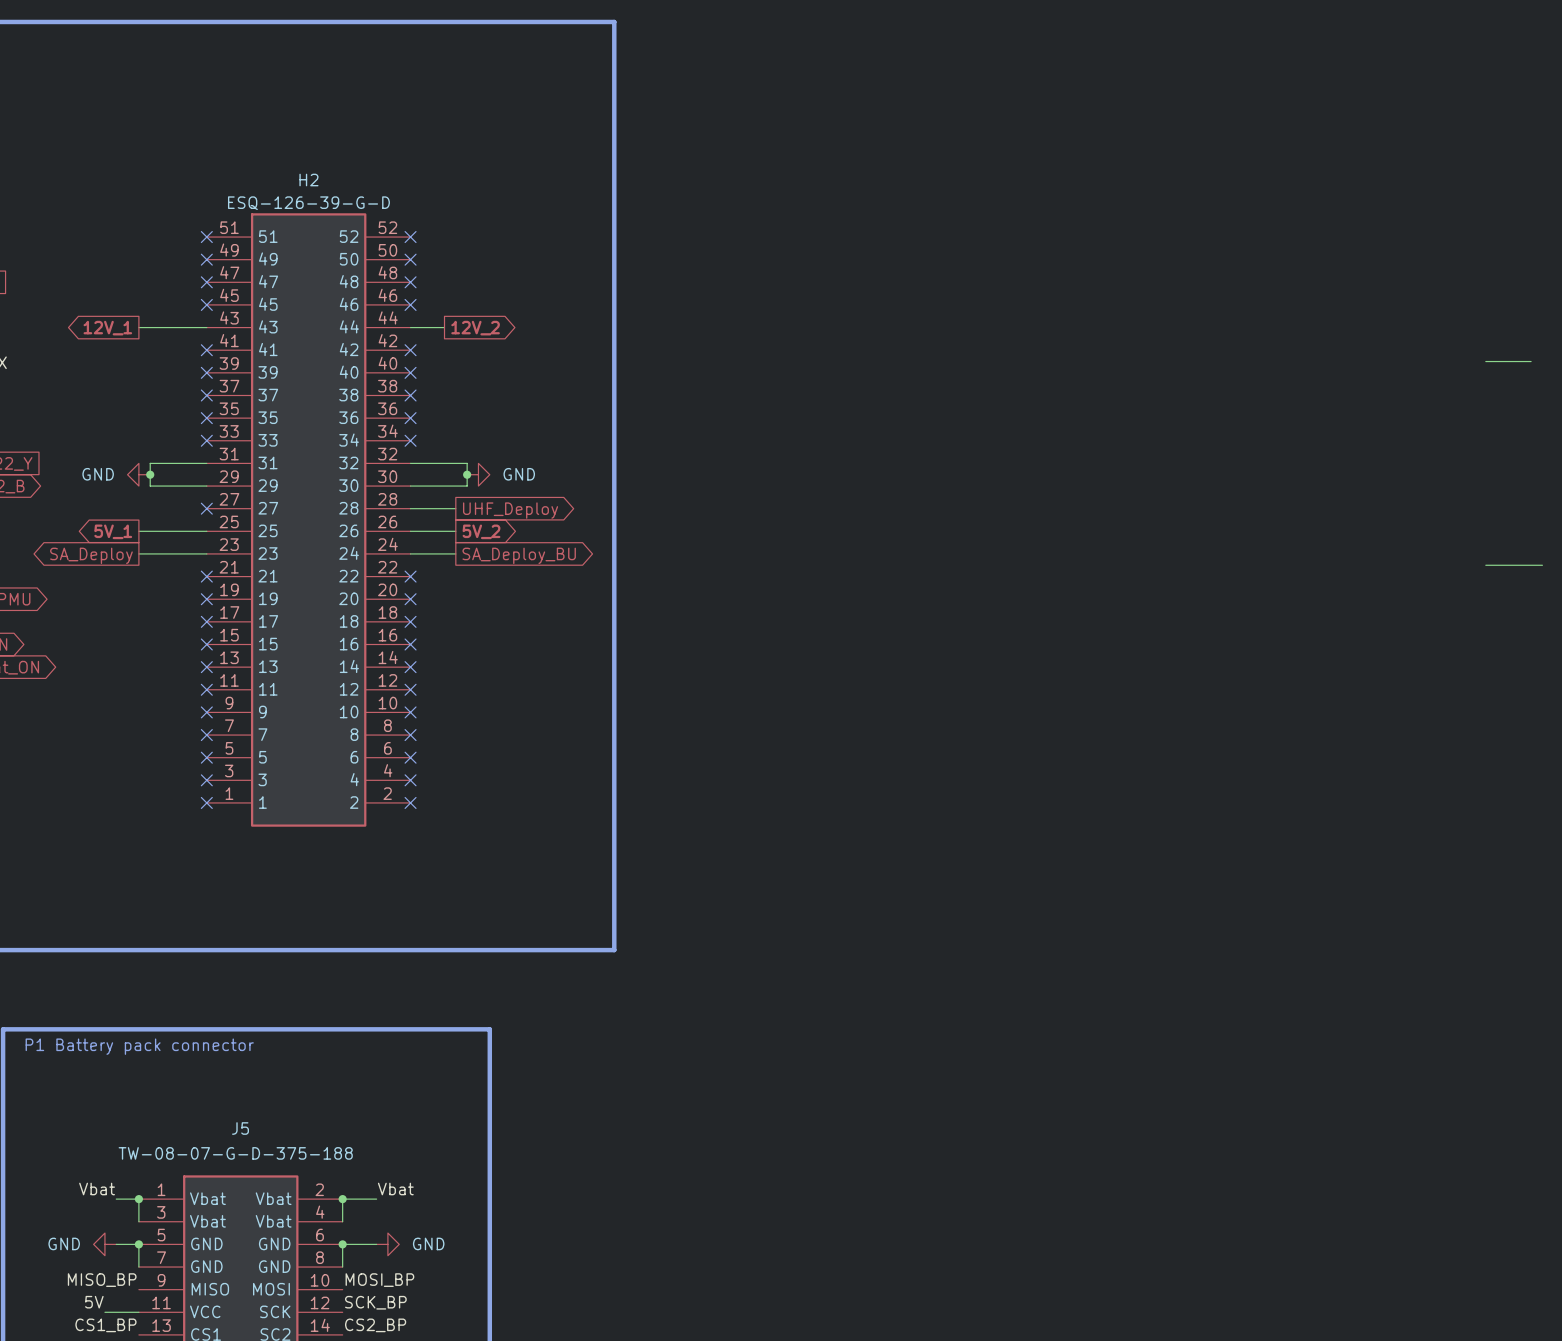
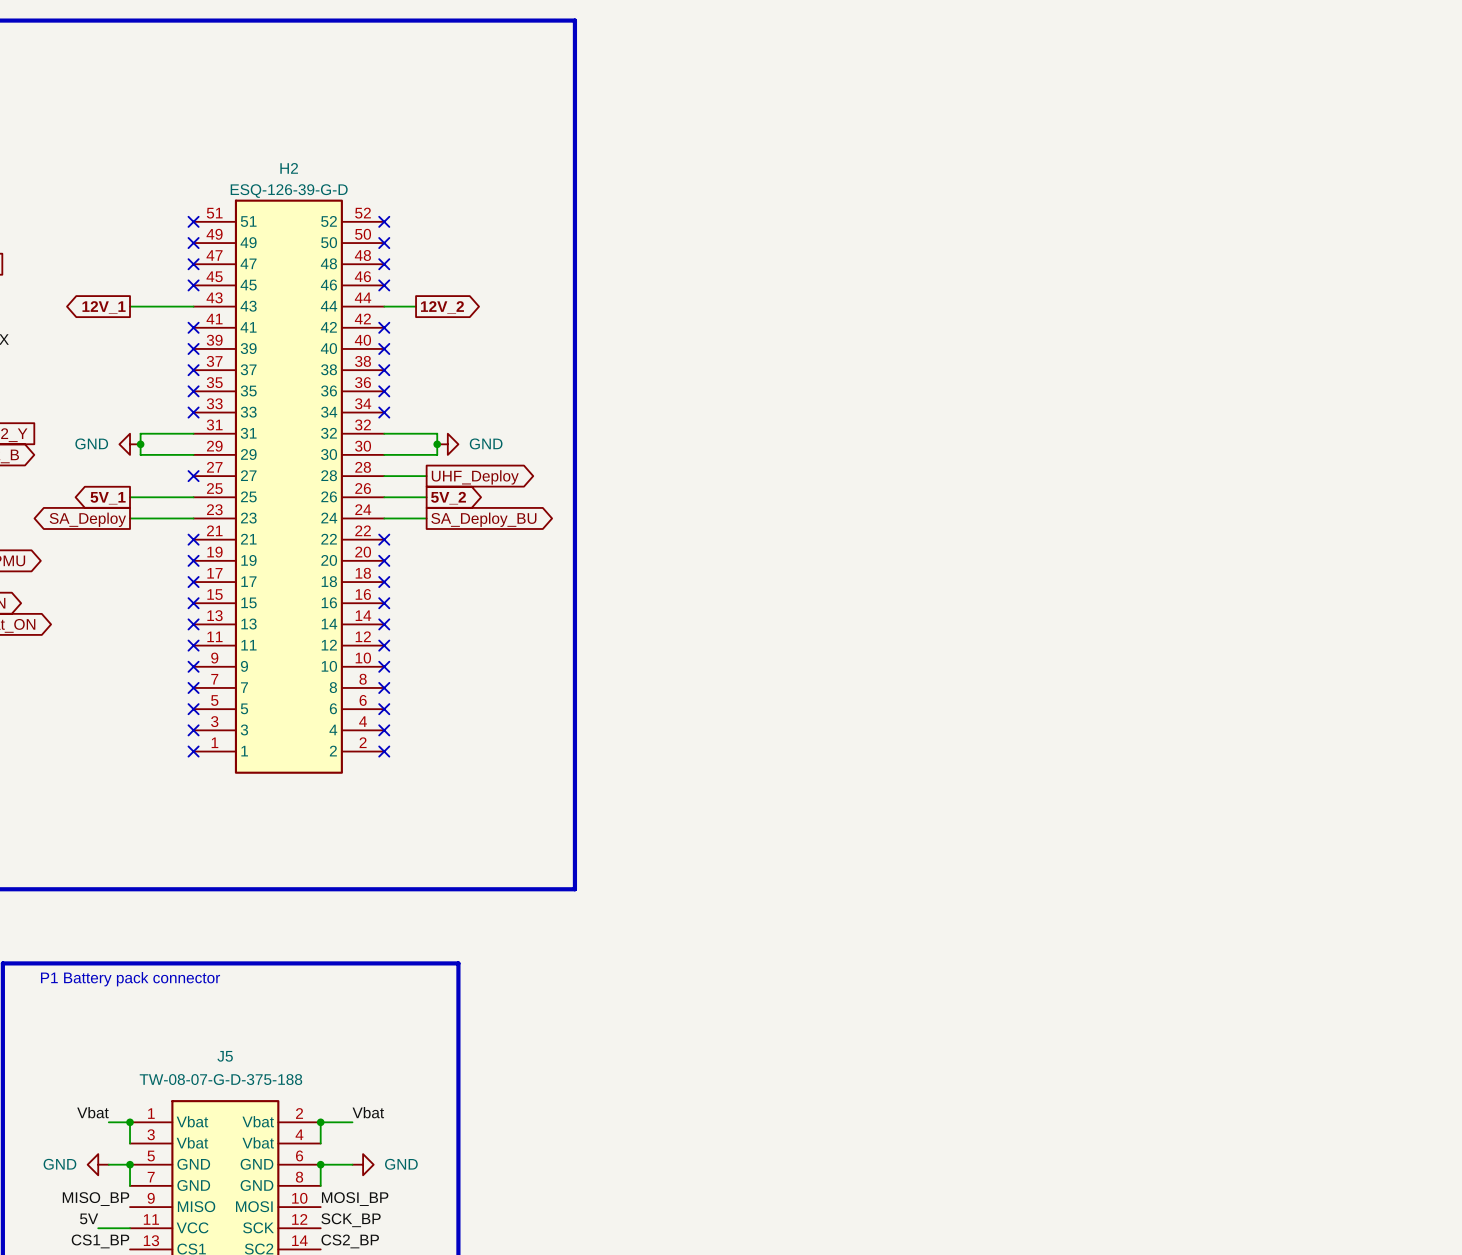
wire: (1485, 361) (1531, 361) -> none
wire: (1485, 565) (1542, 565) -> none

